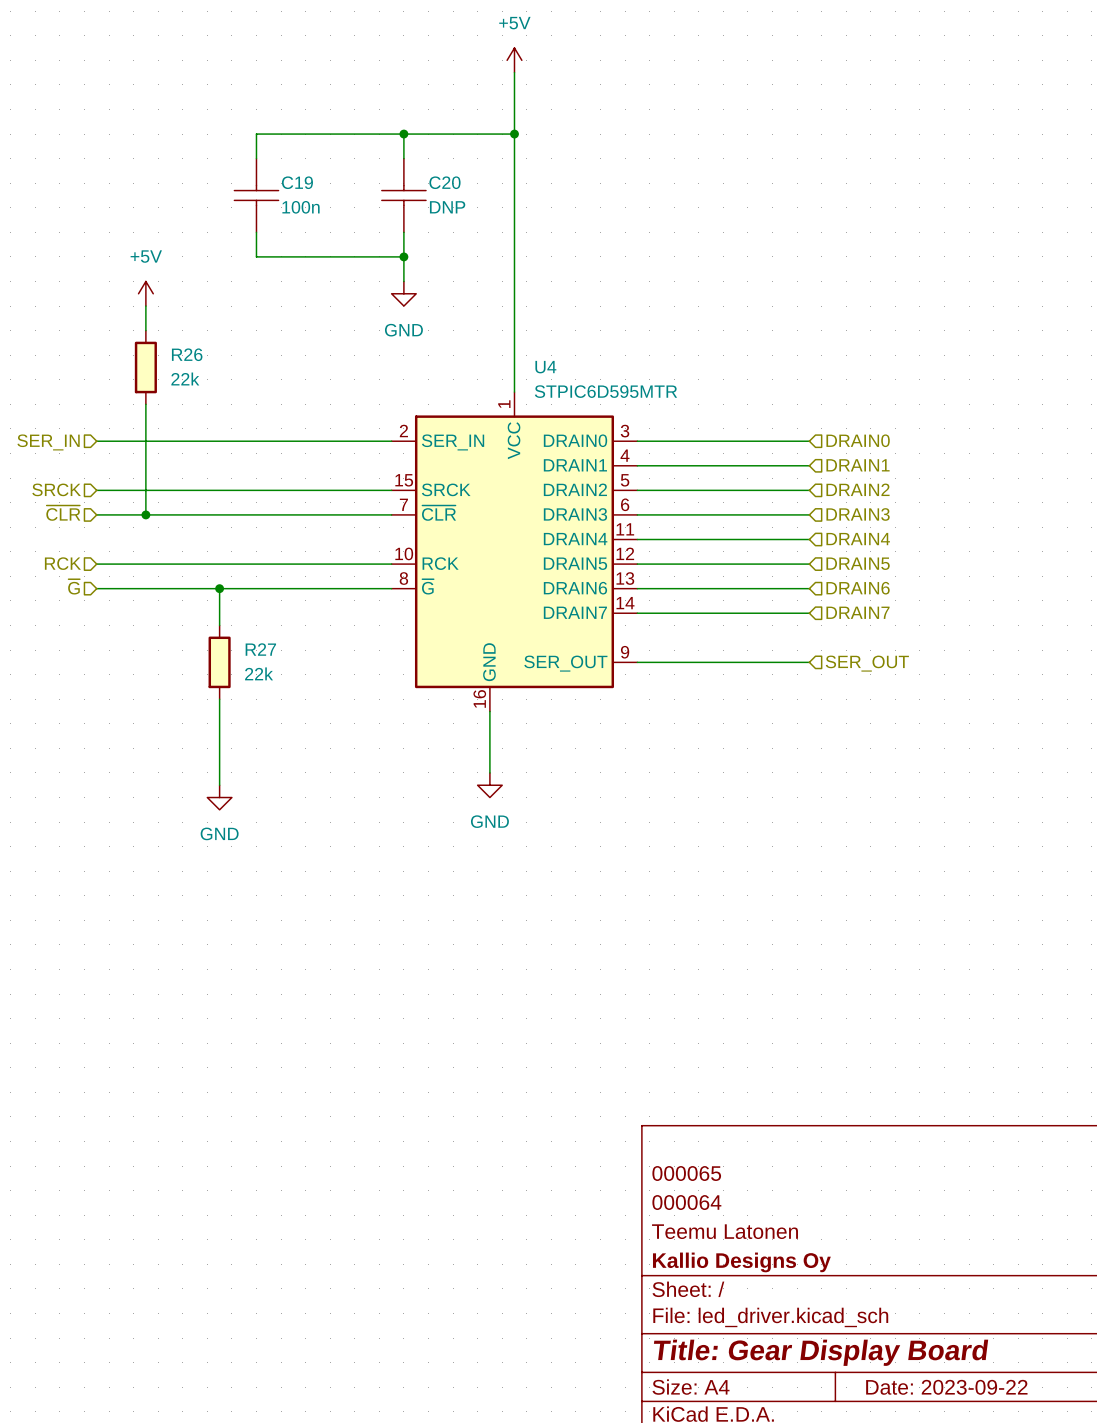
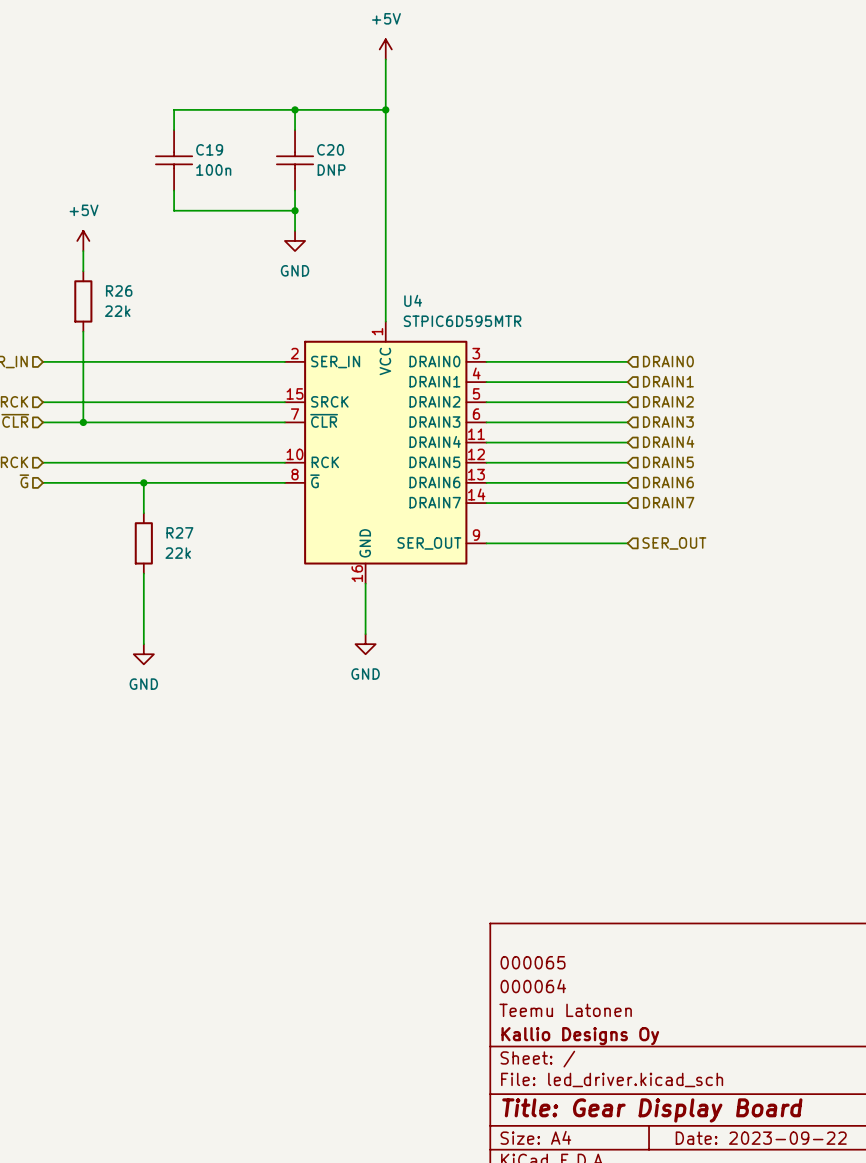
R26 symbol: [134, 330, 157, 405] -> [74, 271, 93, 332]
R27 symbol: [208, 625, 231, 700] -> [134, 513, 153, 574]

